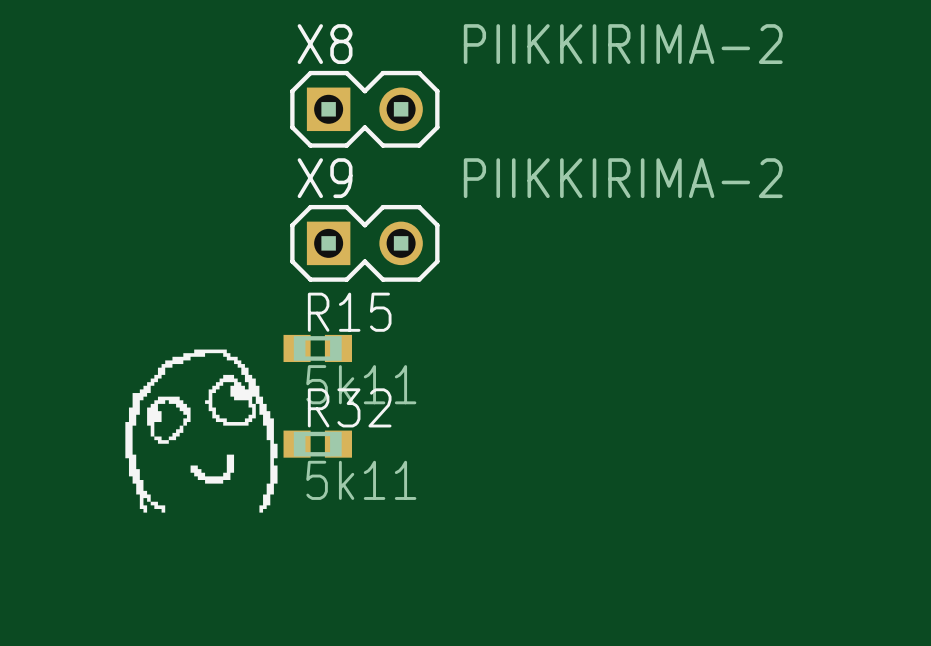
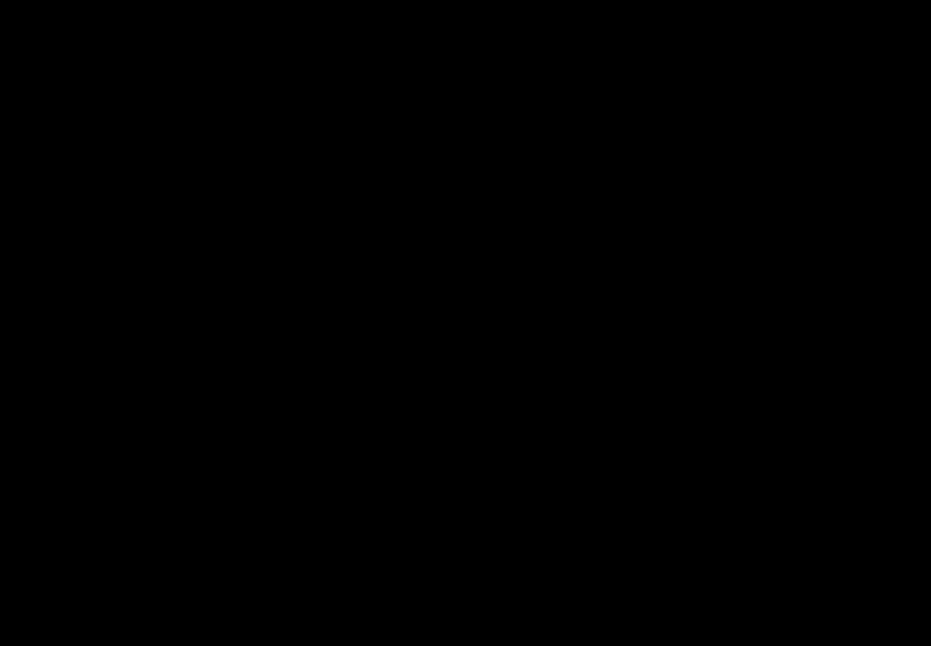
X8: PIIKKIRIMA-2 (364, 109) -> none
X9: PIIKKIRIMA-2 (364, 243) -> none
R15: 5k11 (317, 348) -> none
drawing: [125, 349, 278, 513] -> none
R32: 5k11 (317, 444) -> none

